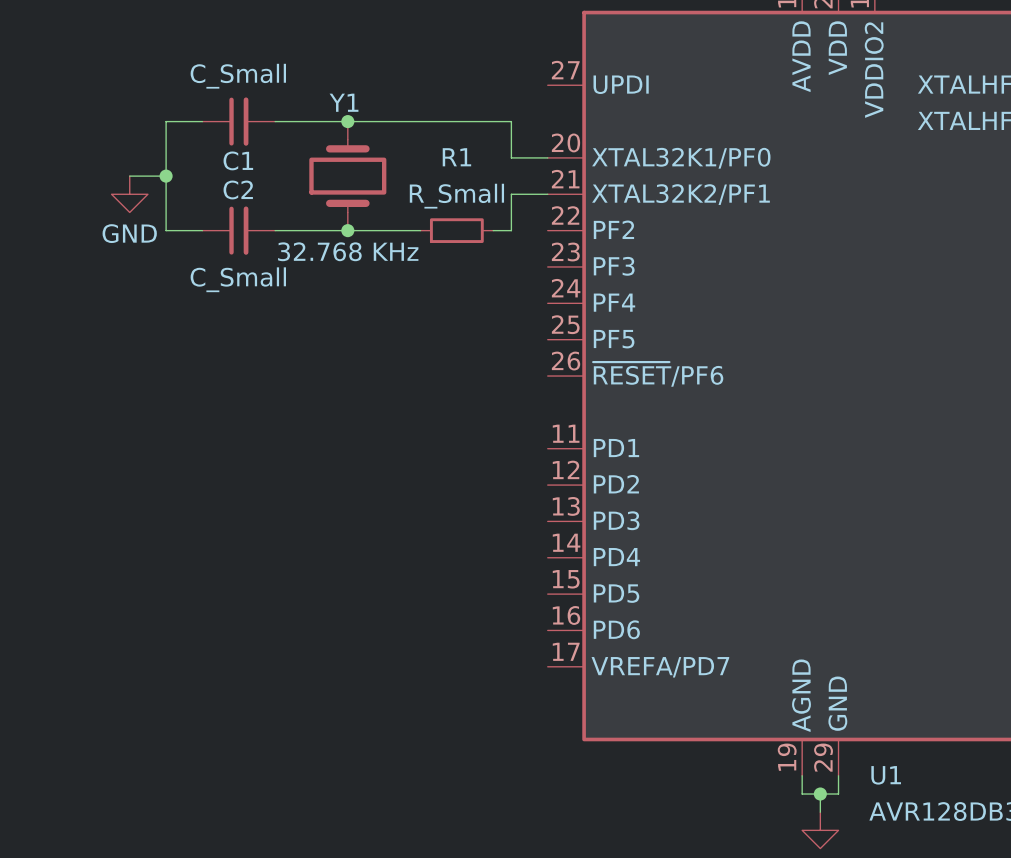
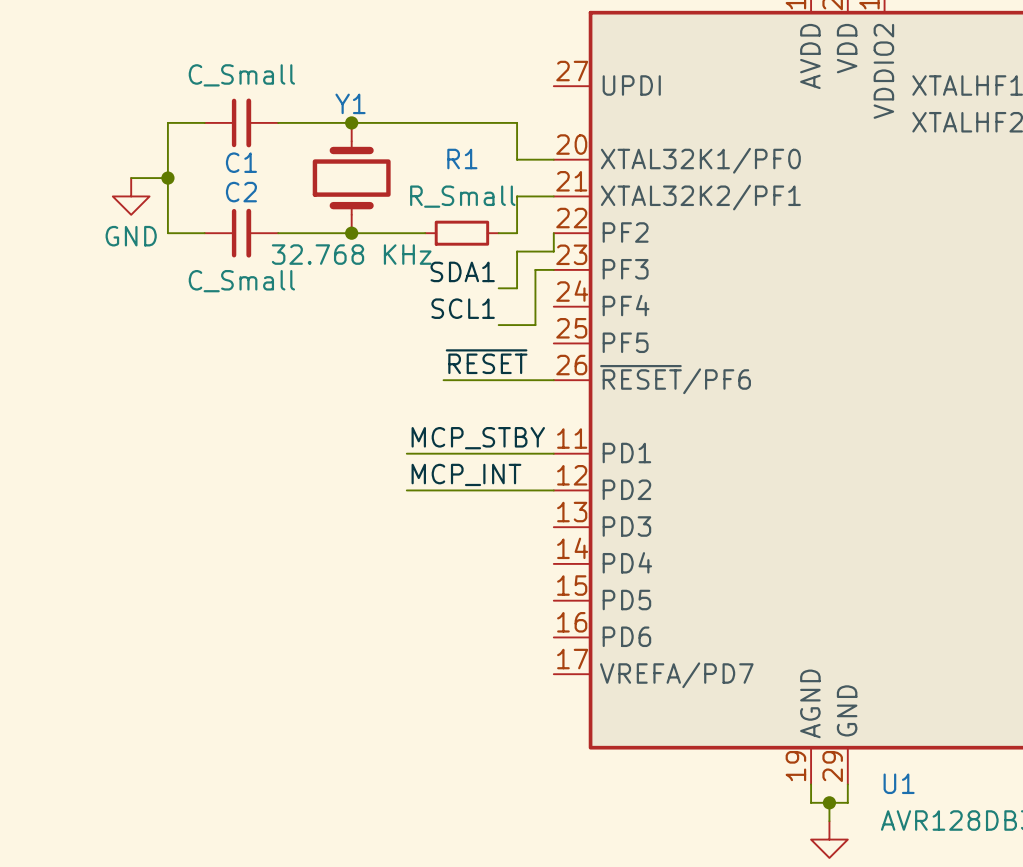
wire: none -> (553, 233) (553, 251) (517, 251) (517, 288) (498, 288)
wire: none -> (553, 269) (535, 269) (535, 325) (498, 325)
label: none -> SDA1 (462, 271)
label: none -> SCL1 (463, 308)
label: none -> ~{RESET} (486, 361)
wire: none -> (443, 380) (553, 380)
label: none -> MCP_STBY (478, 438)
wire: none -> (406, 453) (553, 453)
label: none -> MCP_INT (466, 474)
wire: none -> (406, 490) (553, 490)

